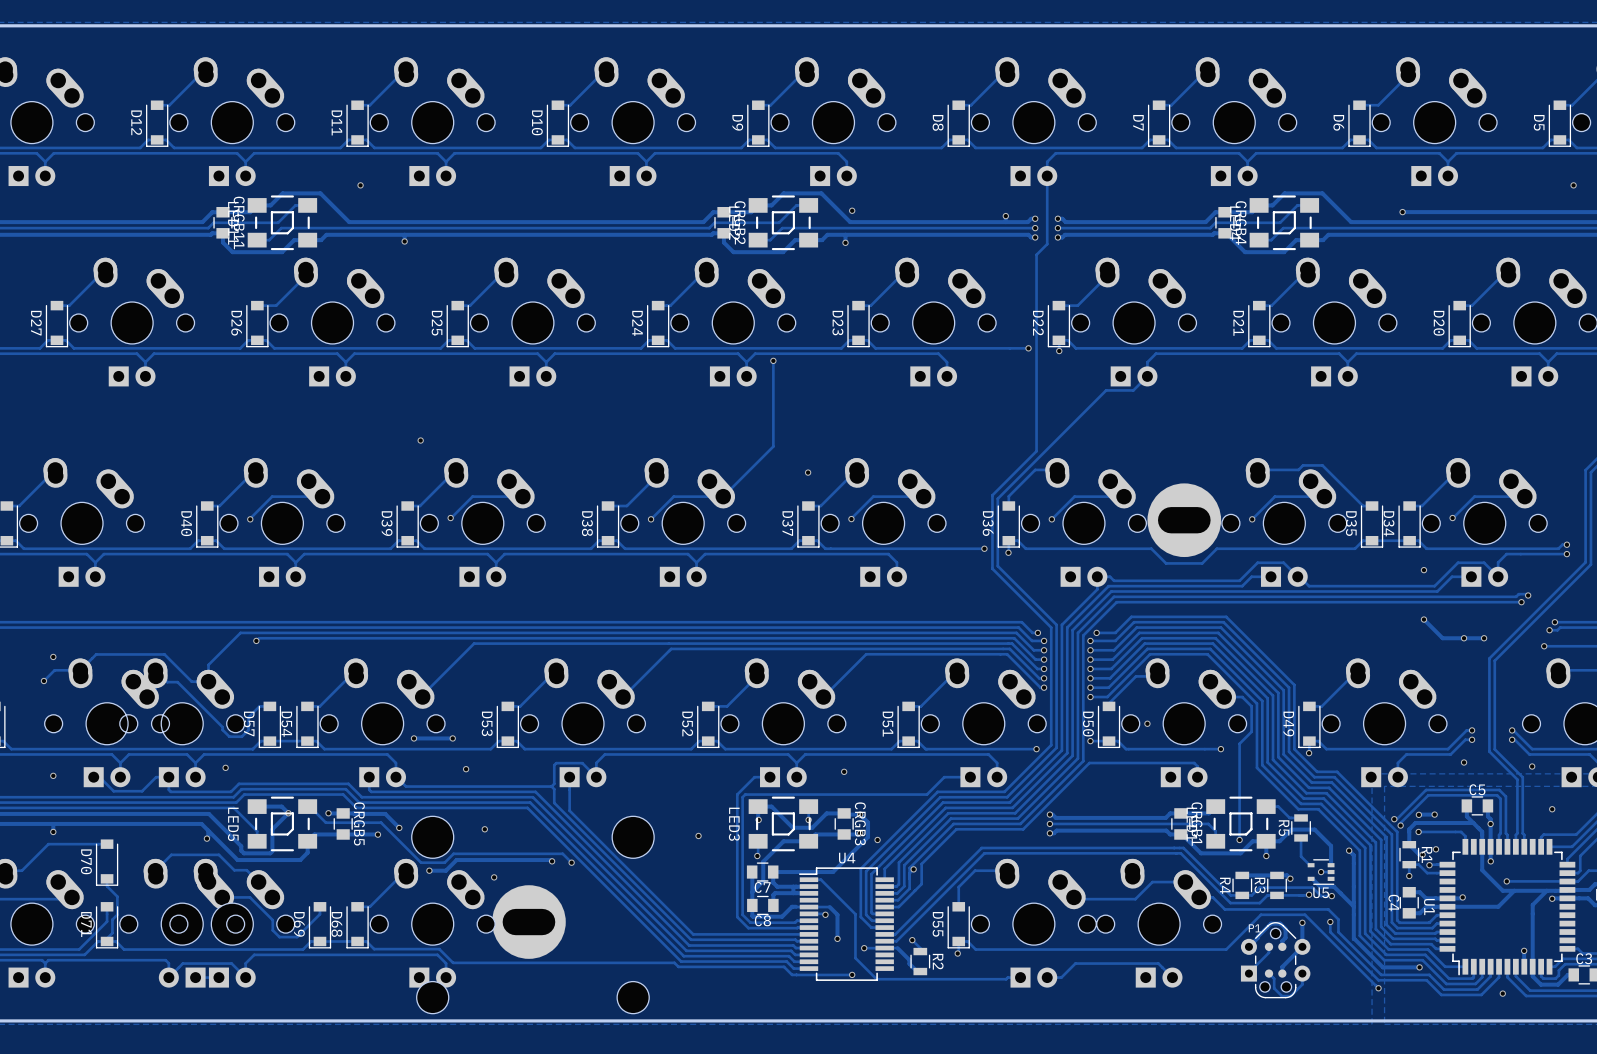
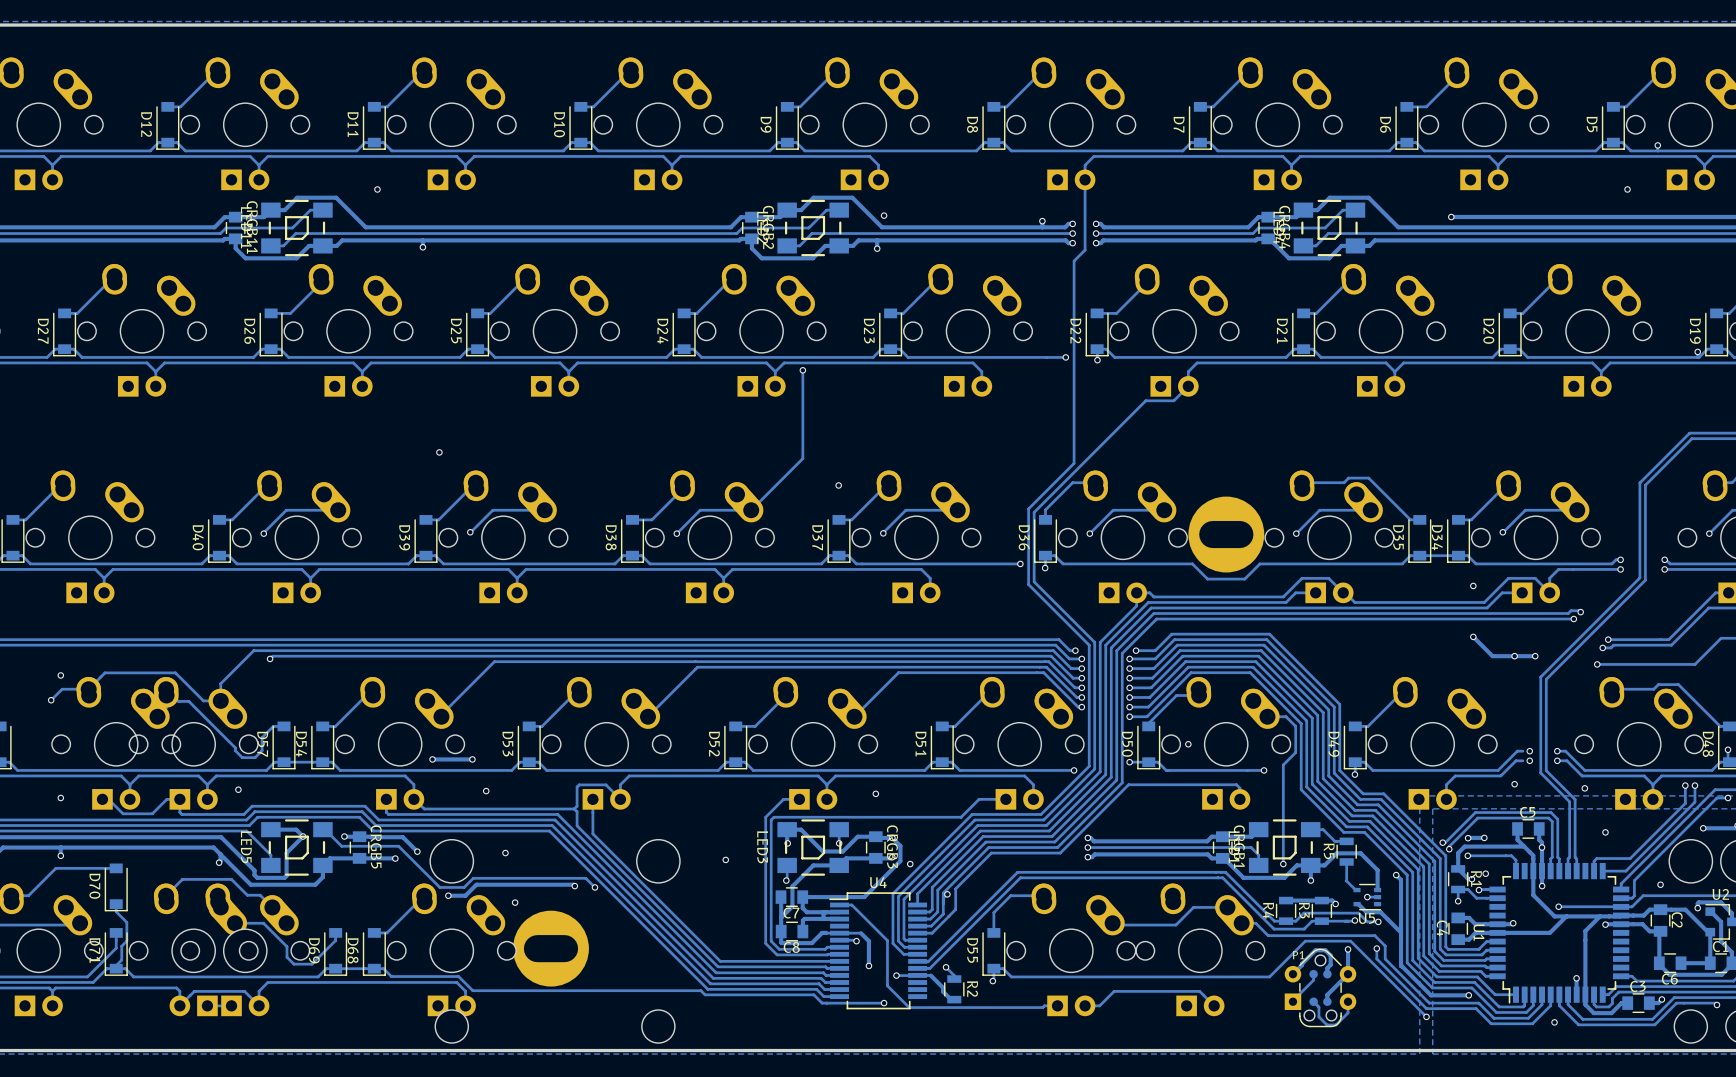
via: (1472, 730) -> none
via: none -> (1529, 751)
via: none -> (1557, 751)
track: none -> (1564, 751) (1557, 751)
via: (1512, 730) -> none
via: (1472, 739) -> none
via: none -> (1529, 760)
via: none -> (1557, 760)
track: none -> (1564, 760) (1557, 760)
via: (1512, 739) -> none

